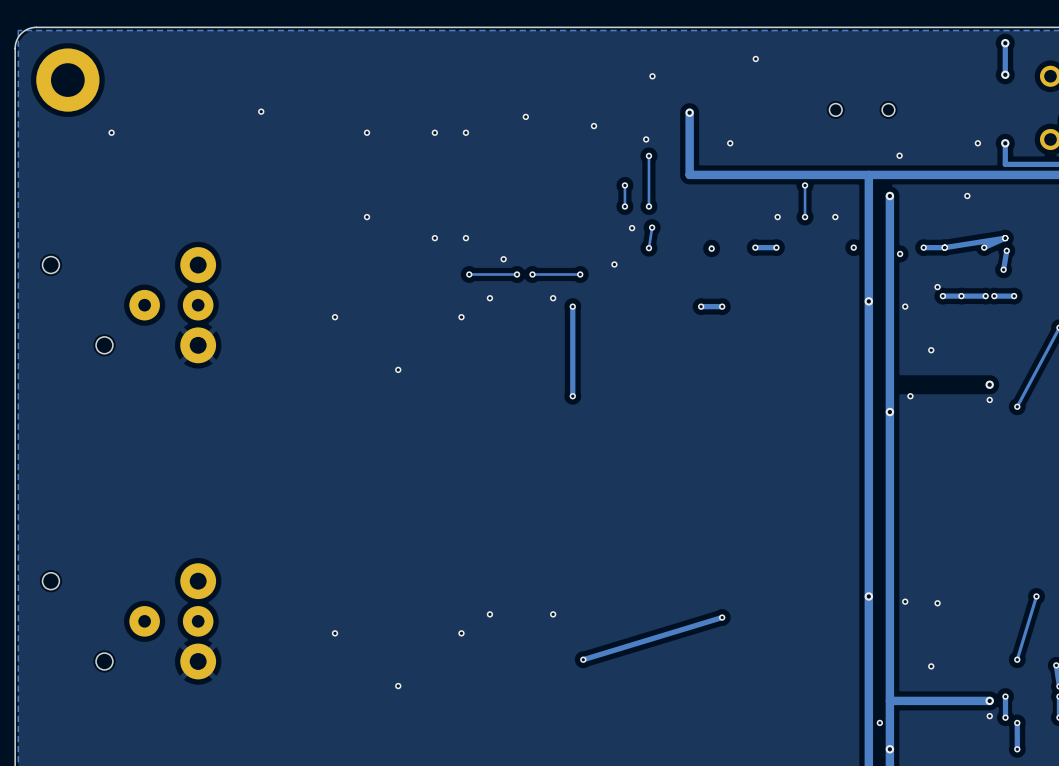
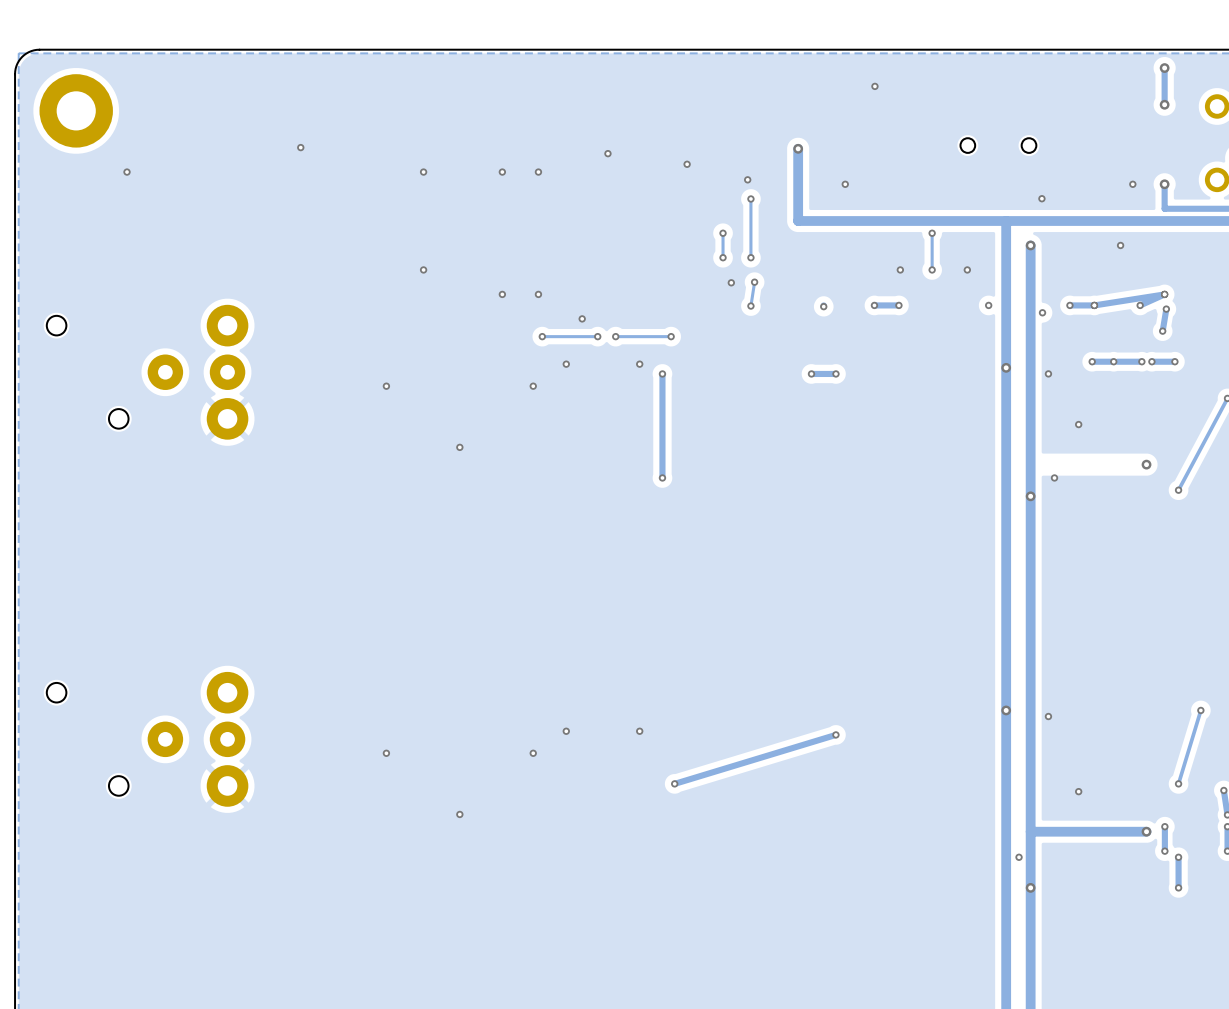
via: (652, 76) -> none
via: (614, 264) -> none
via: (937, 287) -> none
via: (989, 399) -> none
via: (937, 603) -> none
via: (989, 716) -> none

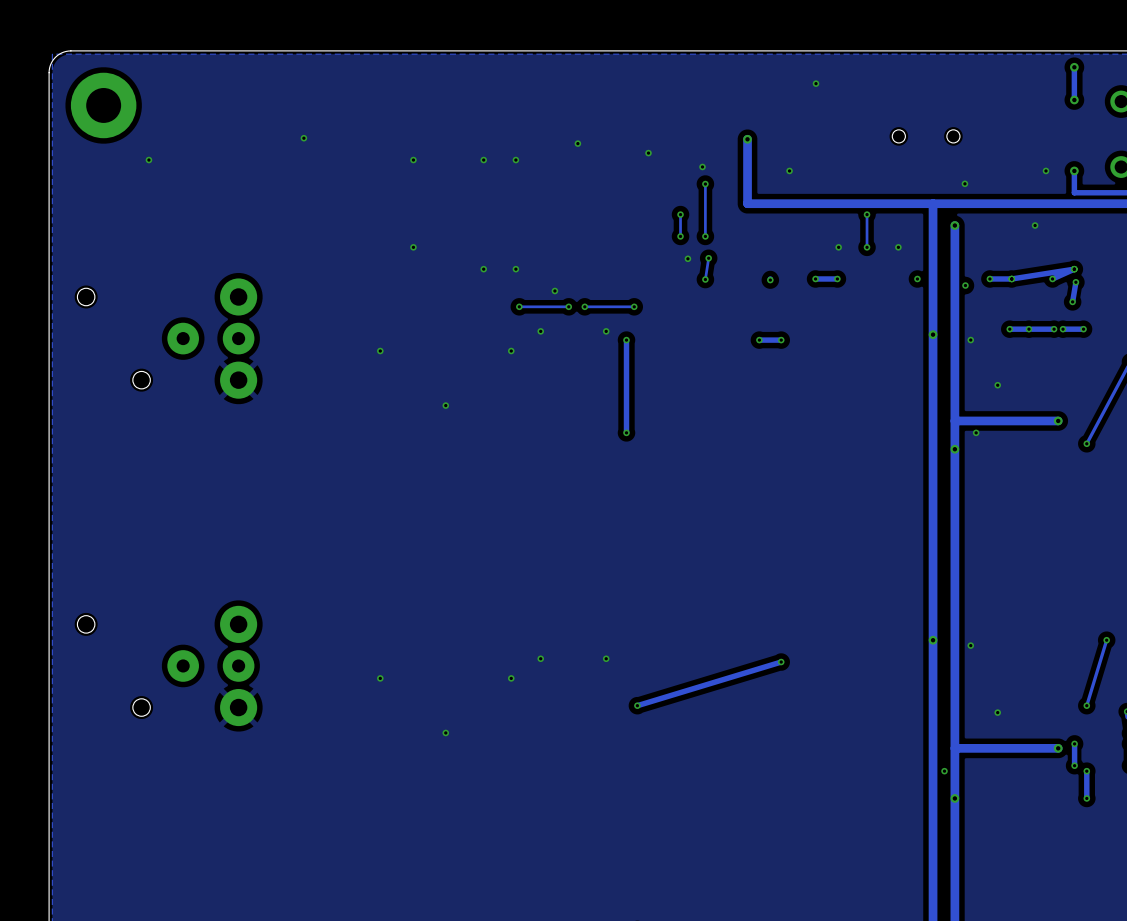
track: none -> (1058, 420) (954, 420)

